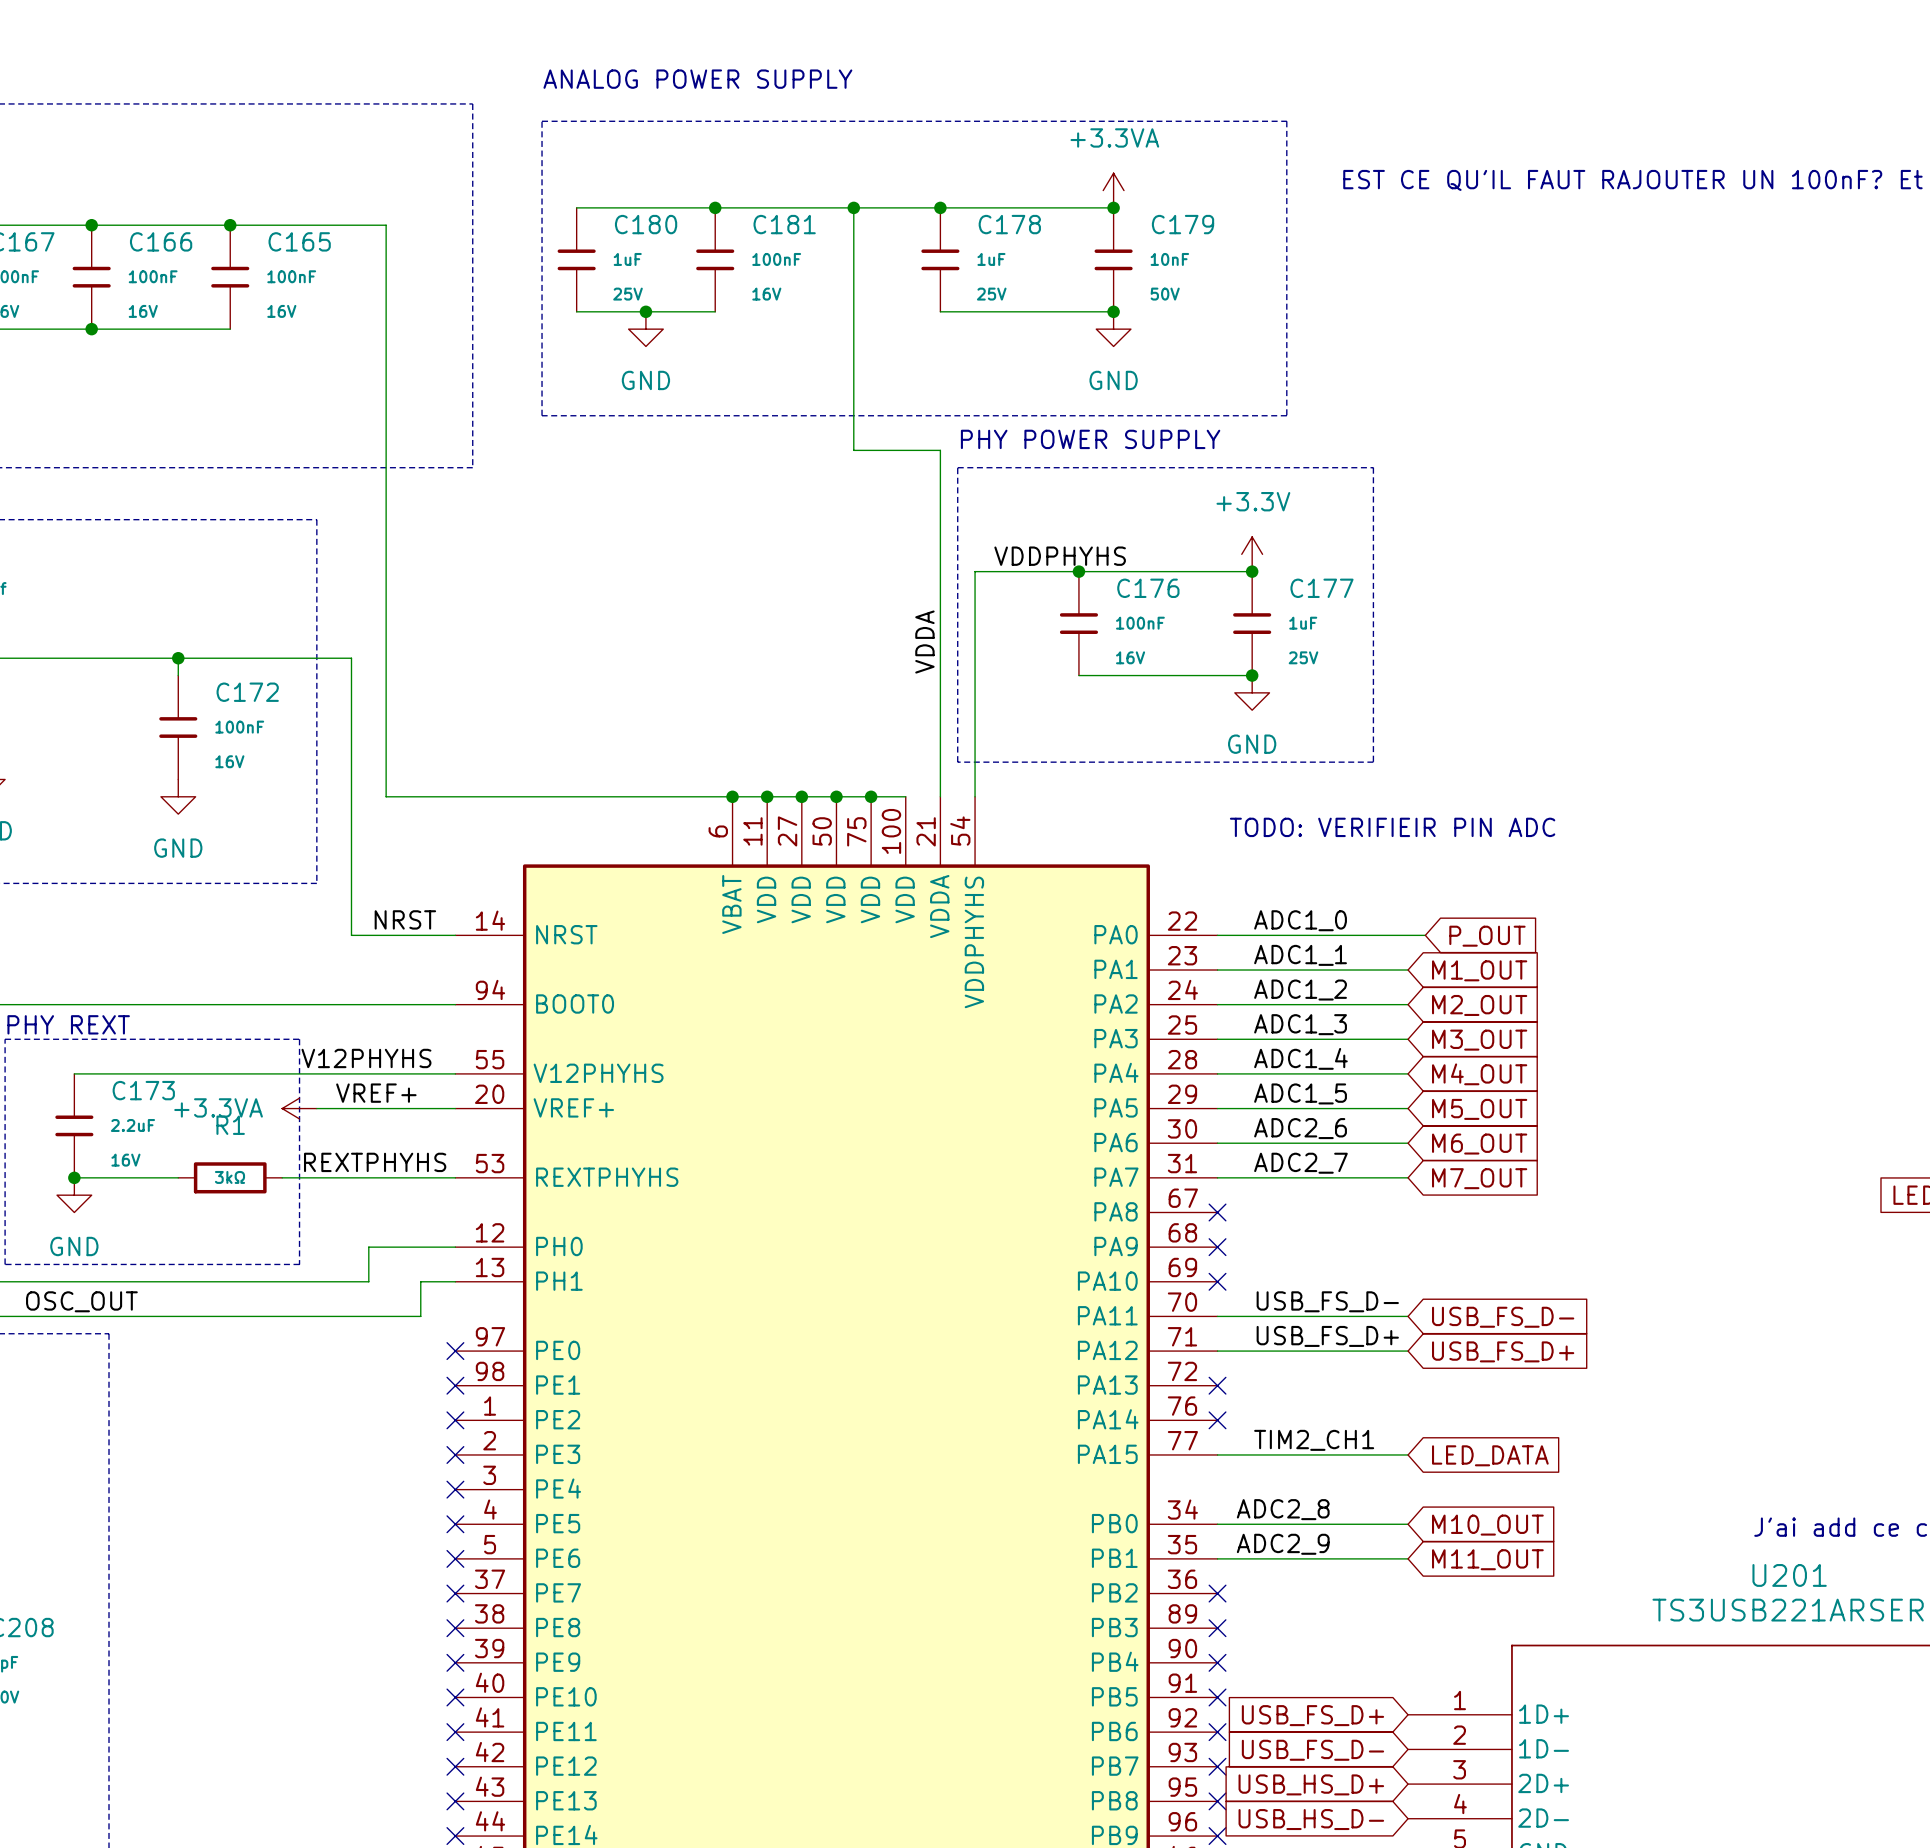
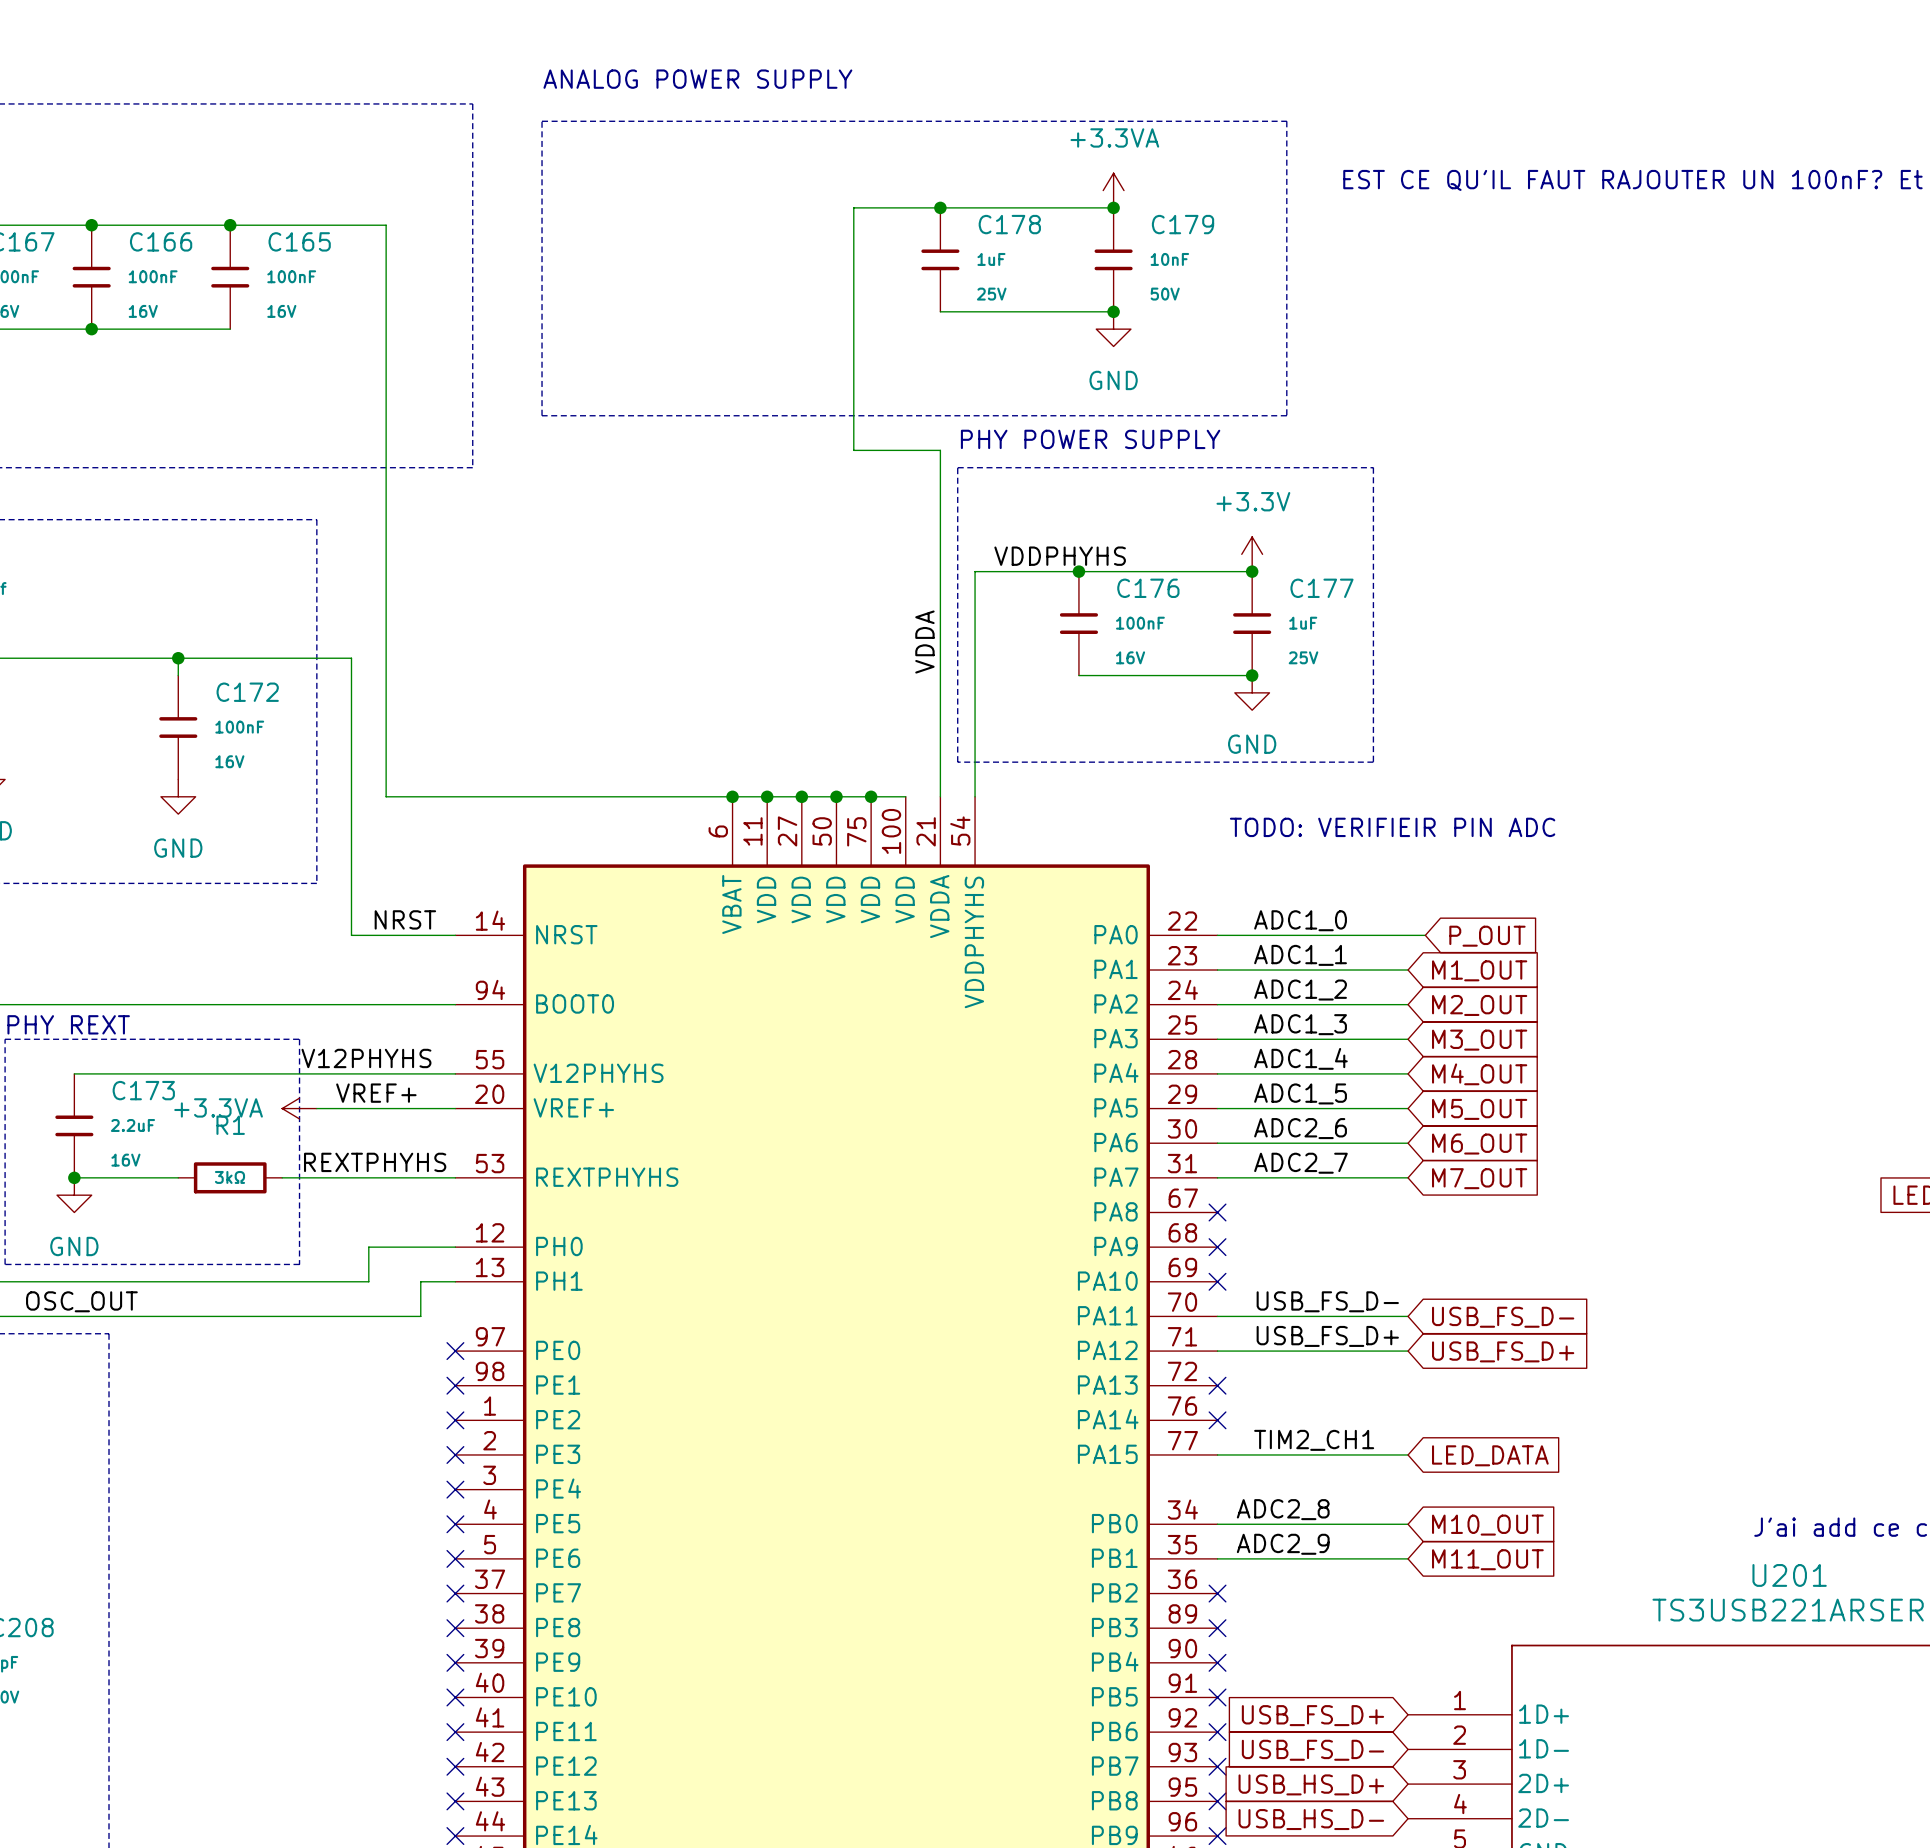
wire: (576, 207) (853, 207) -> none
junction: (715, 207) -> none
junction: (853, 207) -> none
C180: 1uF (576, 259) -> none
C181: 100nF (715, 259) -> none
wire: (576, 311) (715, 311) -> none
junction: (645, 311) -> none
power symbol: GND (645, 329) -> none

